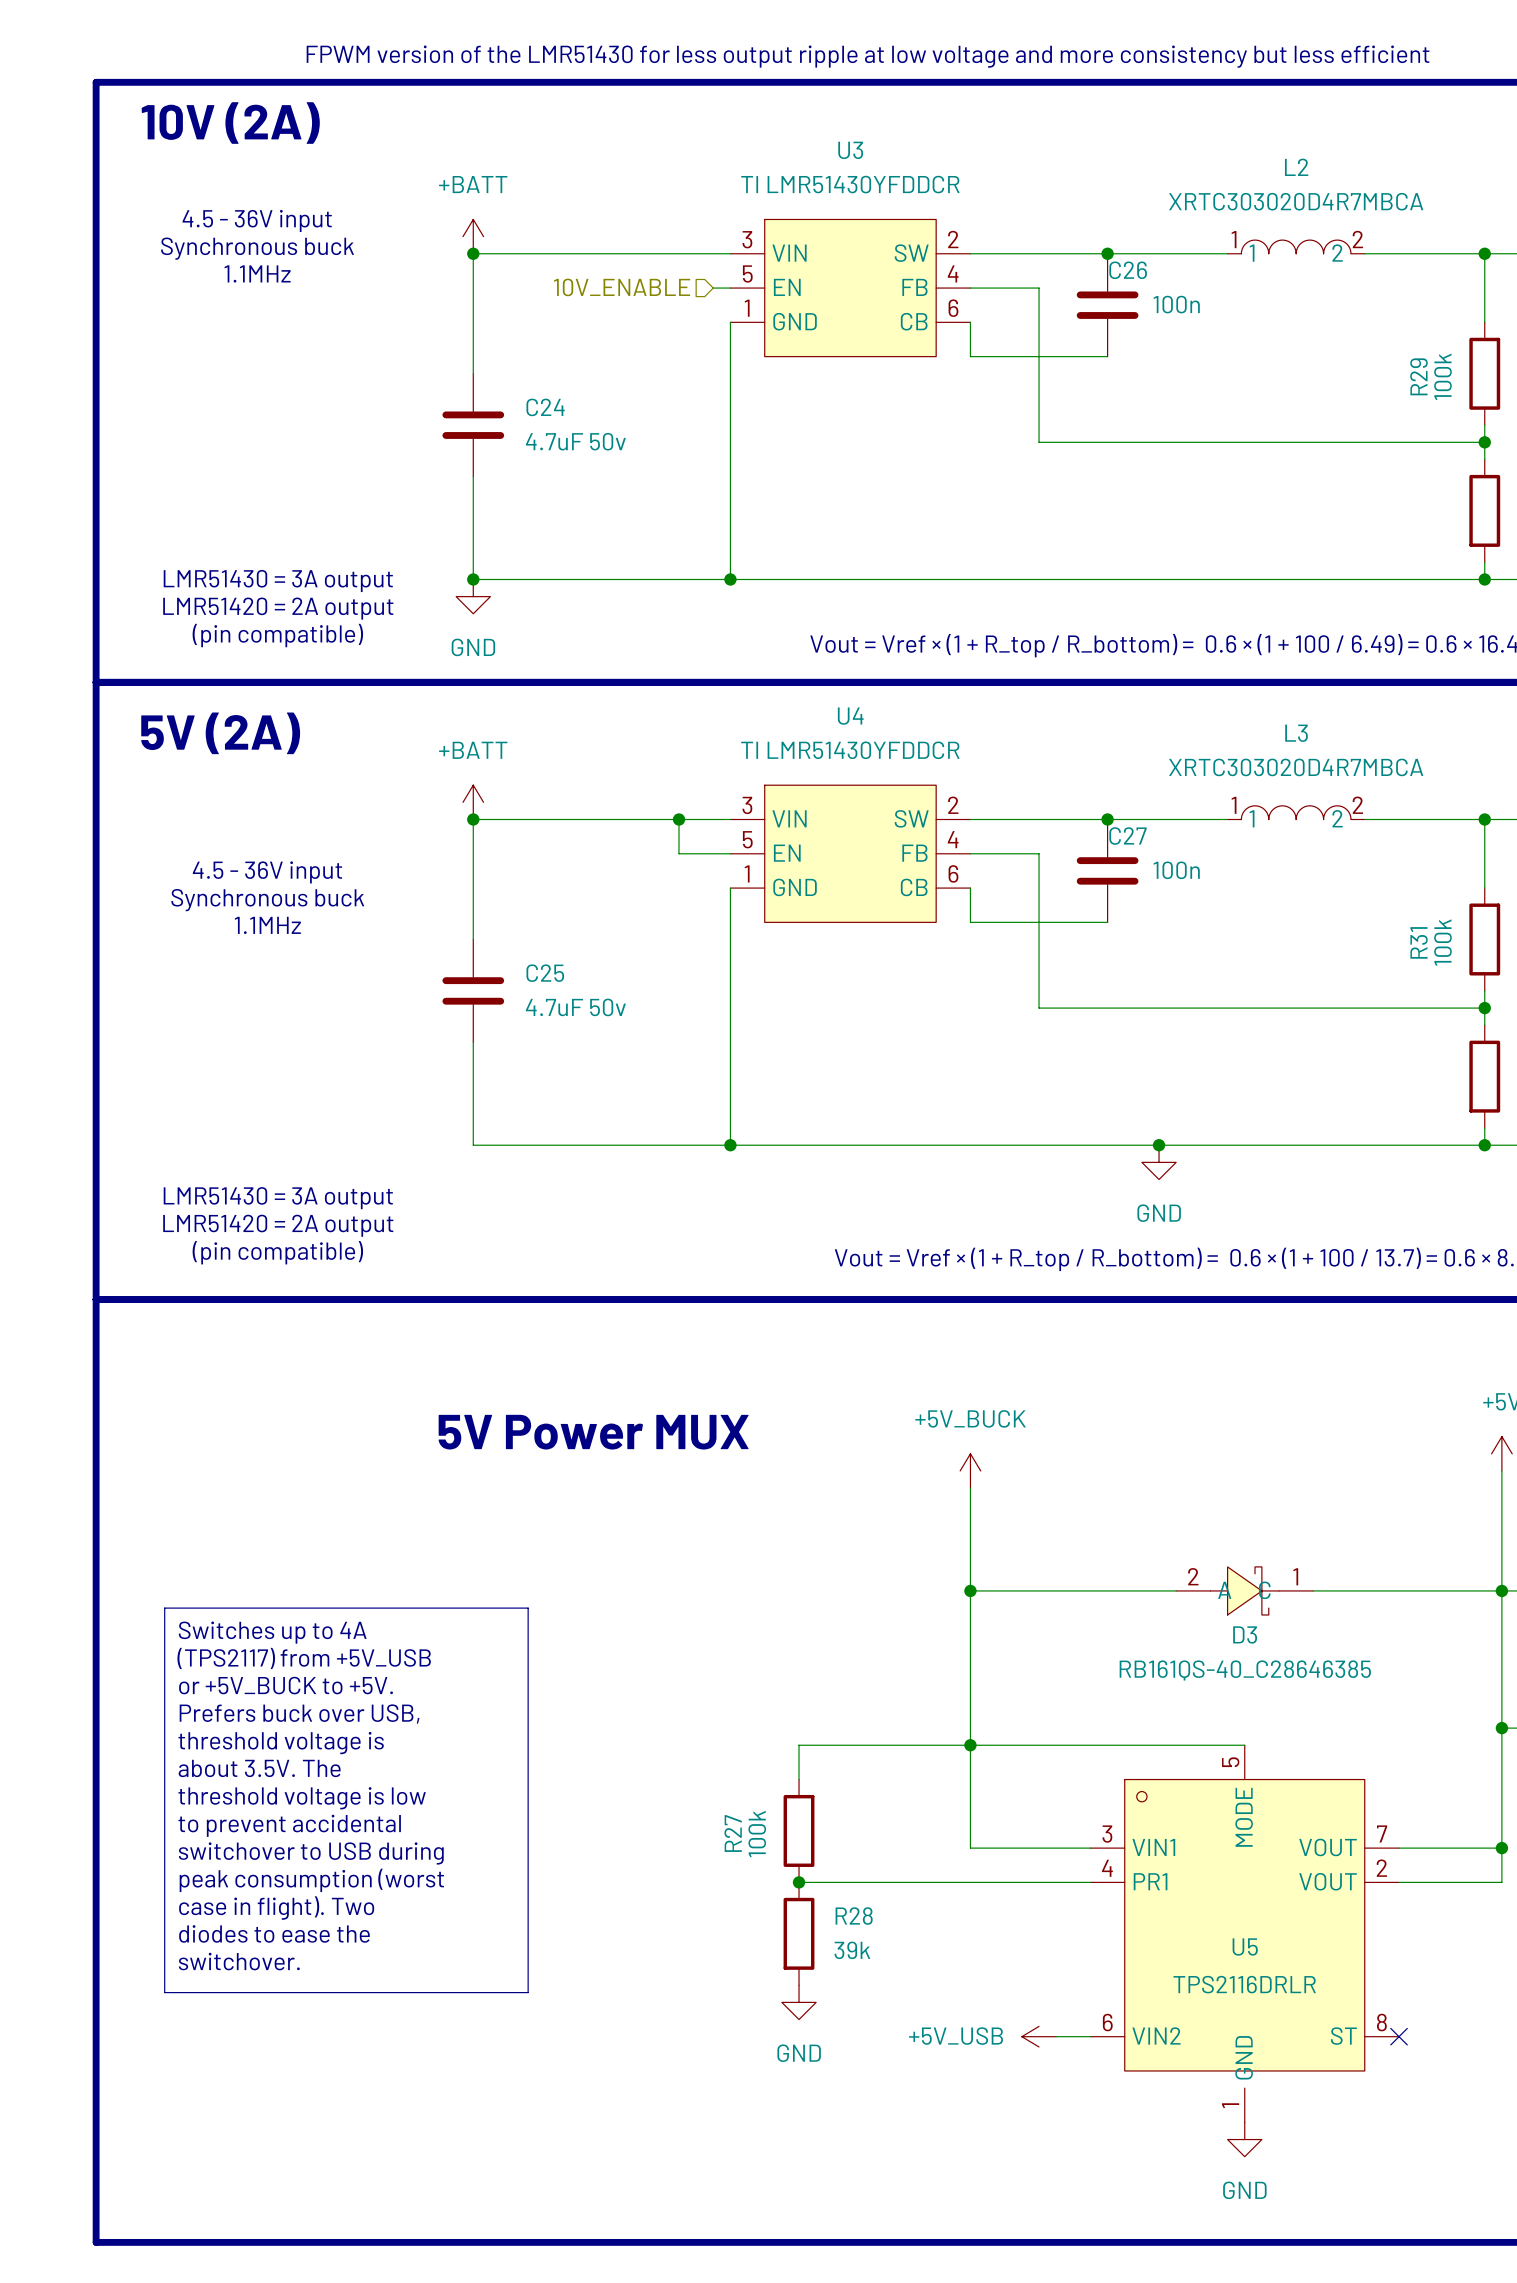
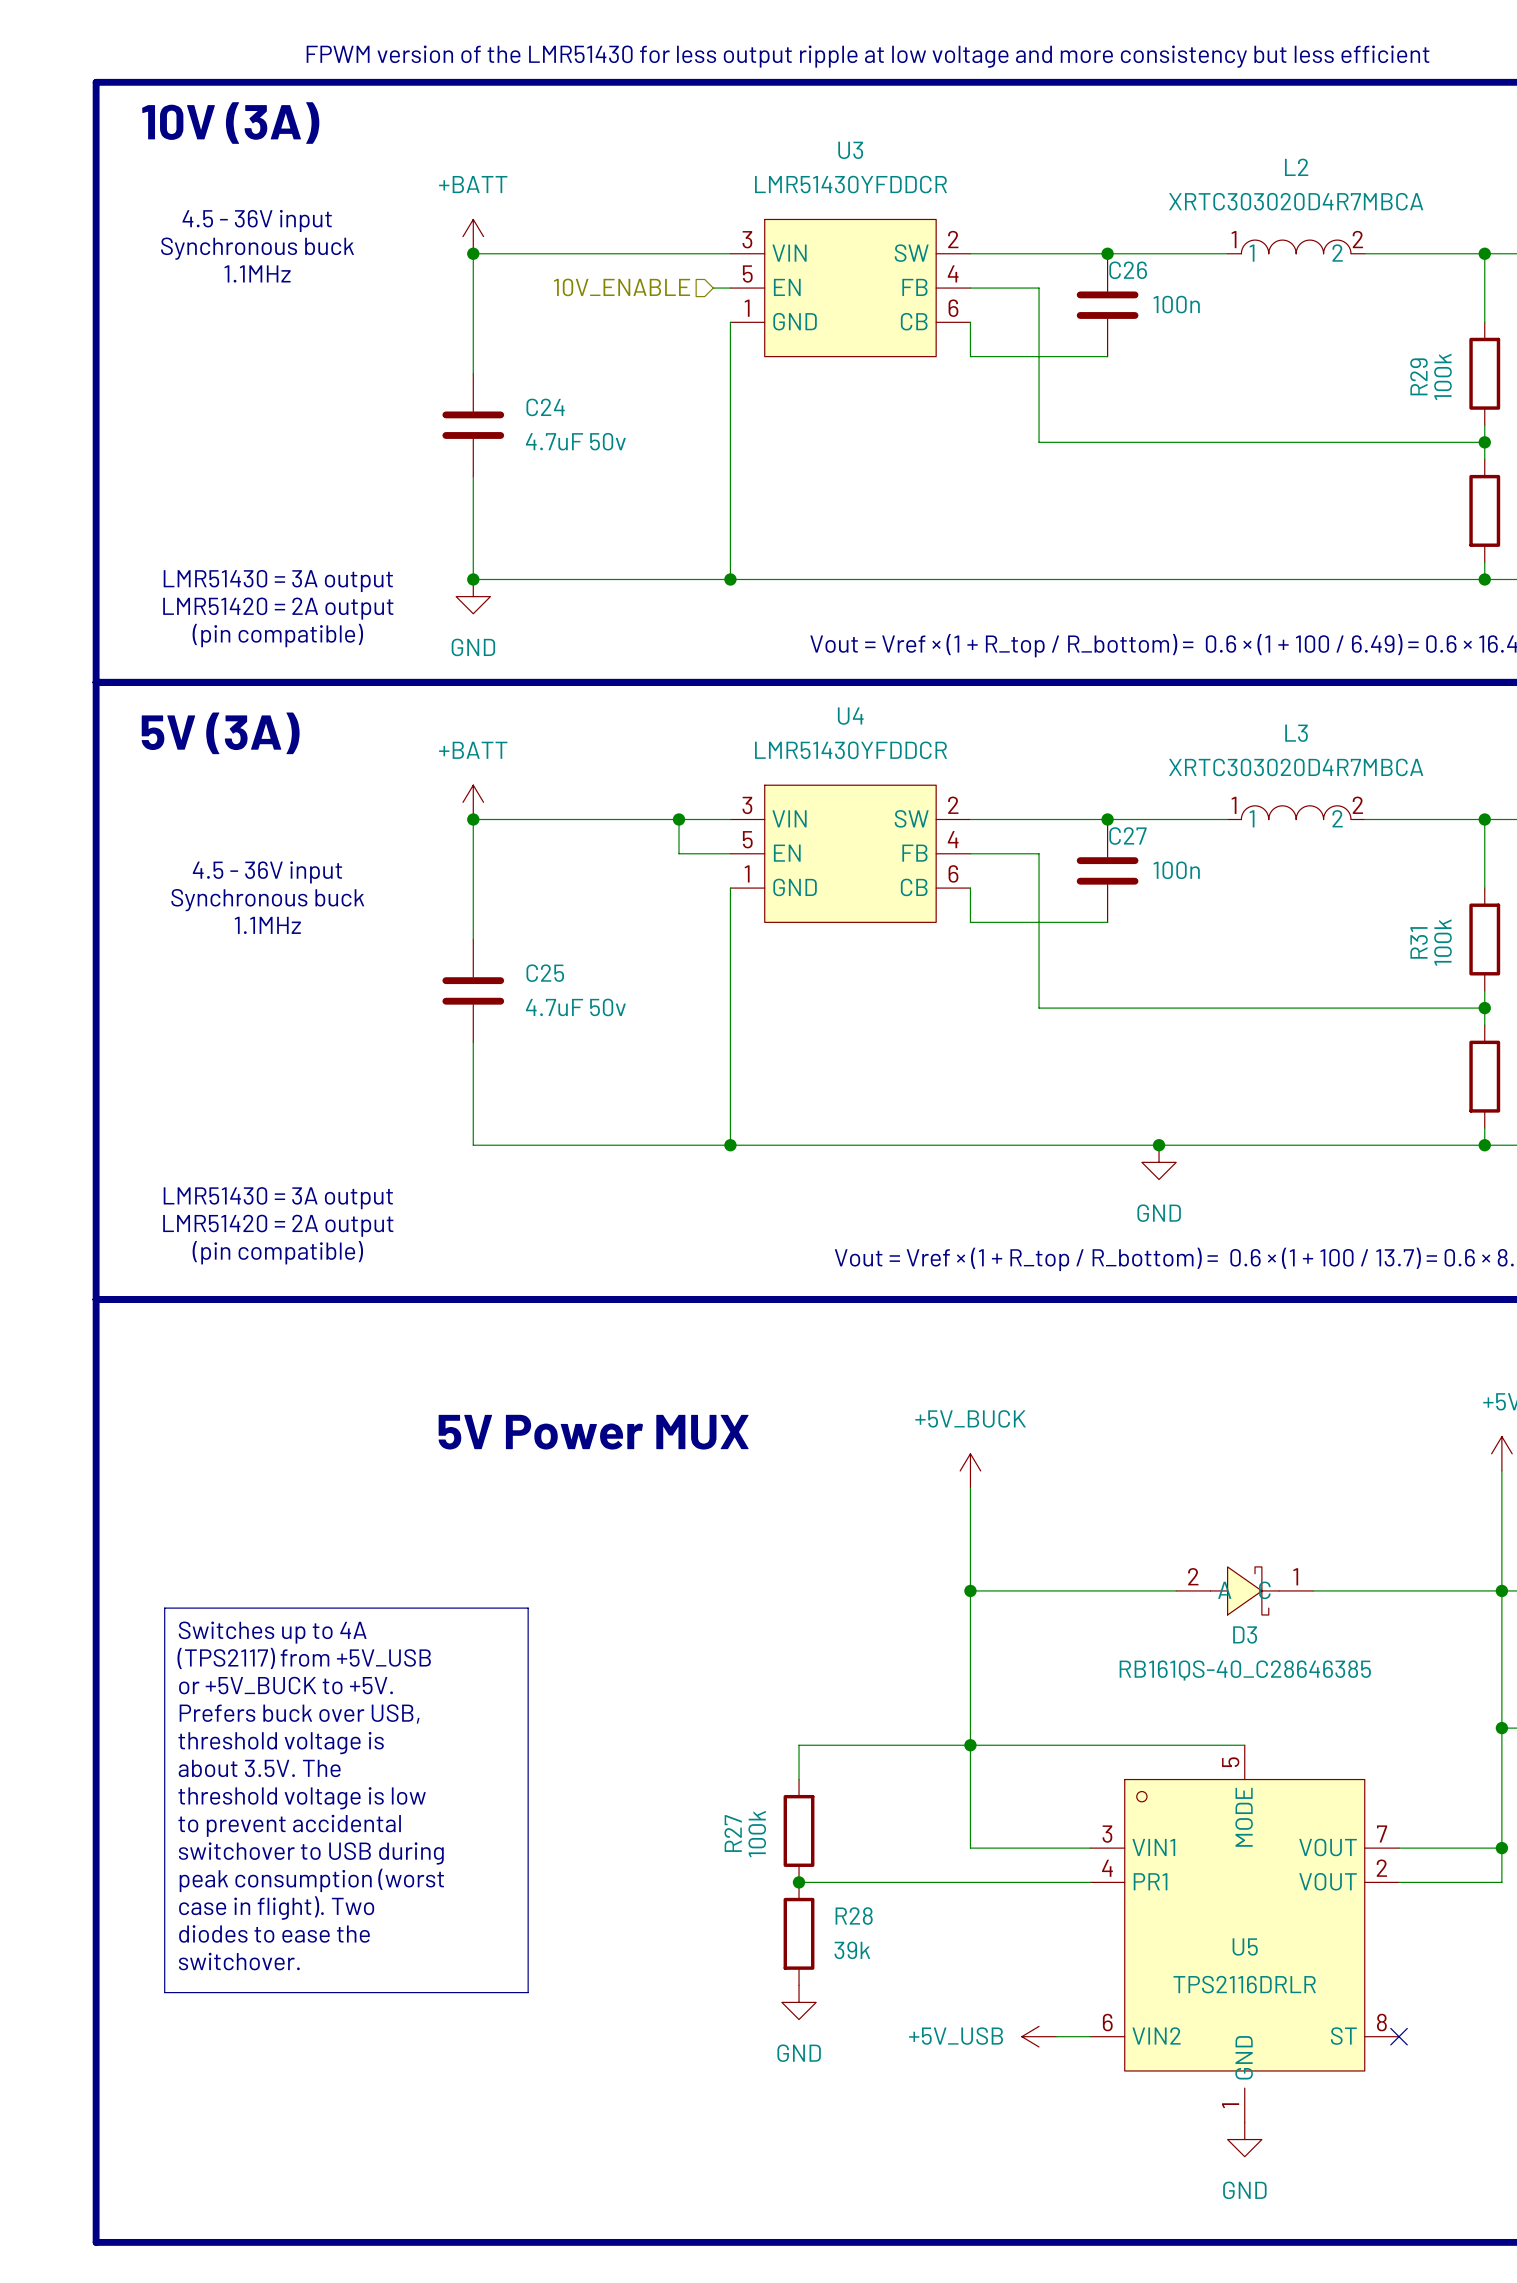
text: 10V (2A) (230, 123) -> 10V (3A) (230, 123)
U3 value: TI LMR51430YFDDCR (850, 184) -> LMR51430YFDDCR (850, 184)
text: 5V (2A) (220, 733) -> 5V (3A) (220, 733)
U4 value: TI LMR51430YFDDCR (850, 750) -> LMR51430YFDDCR (850, 750)

